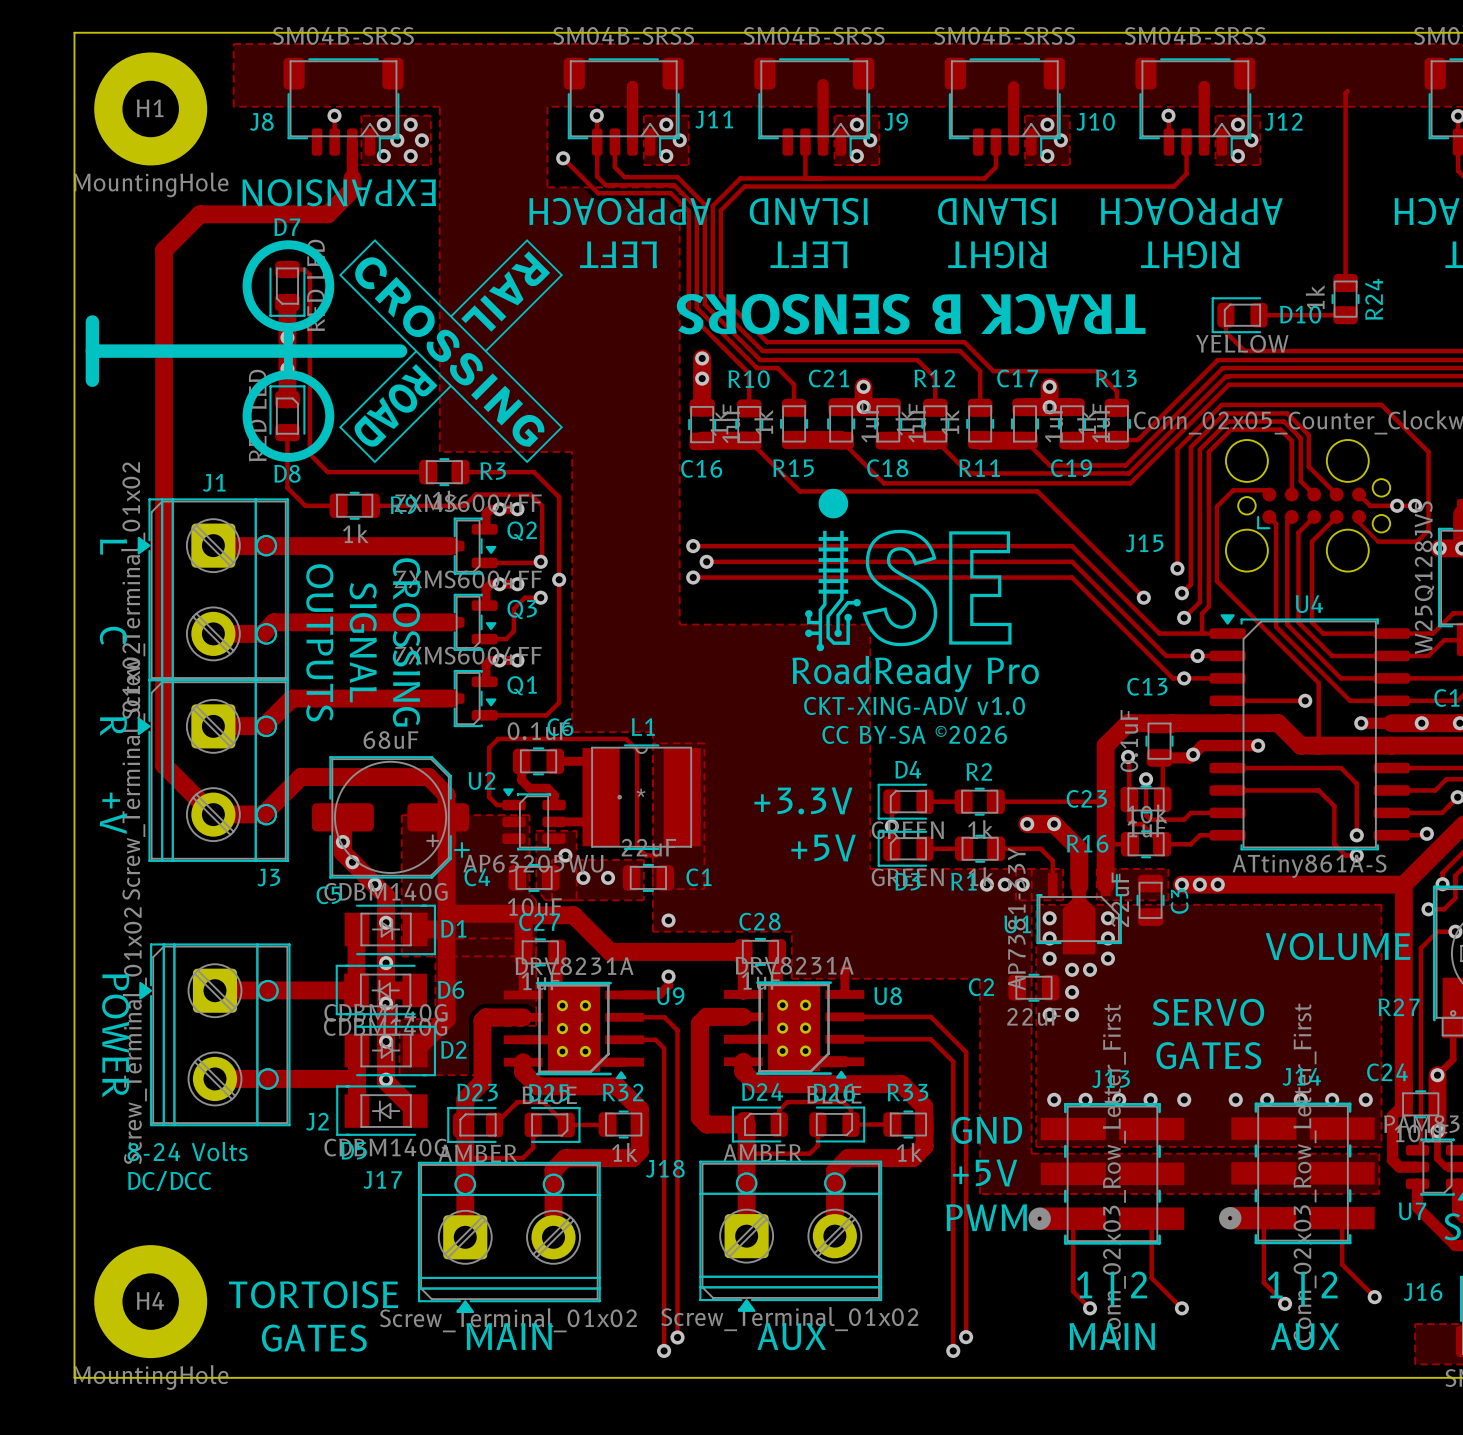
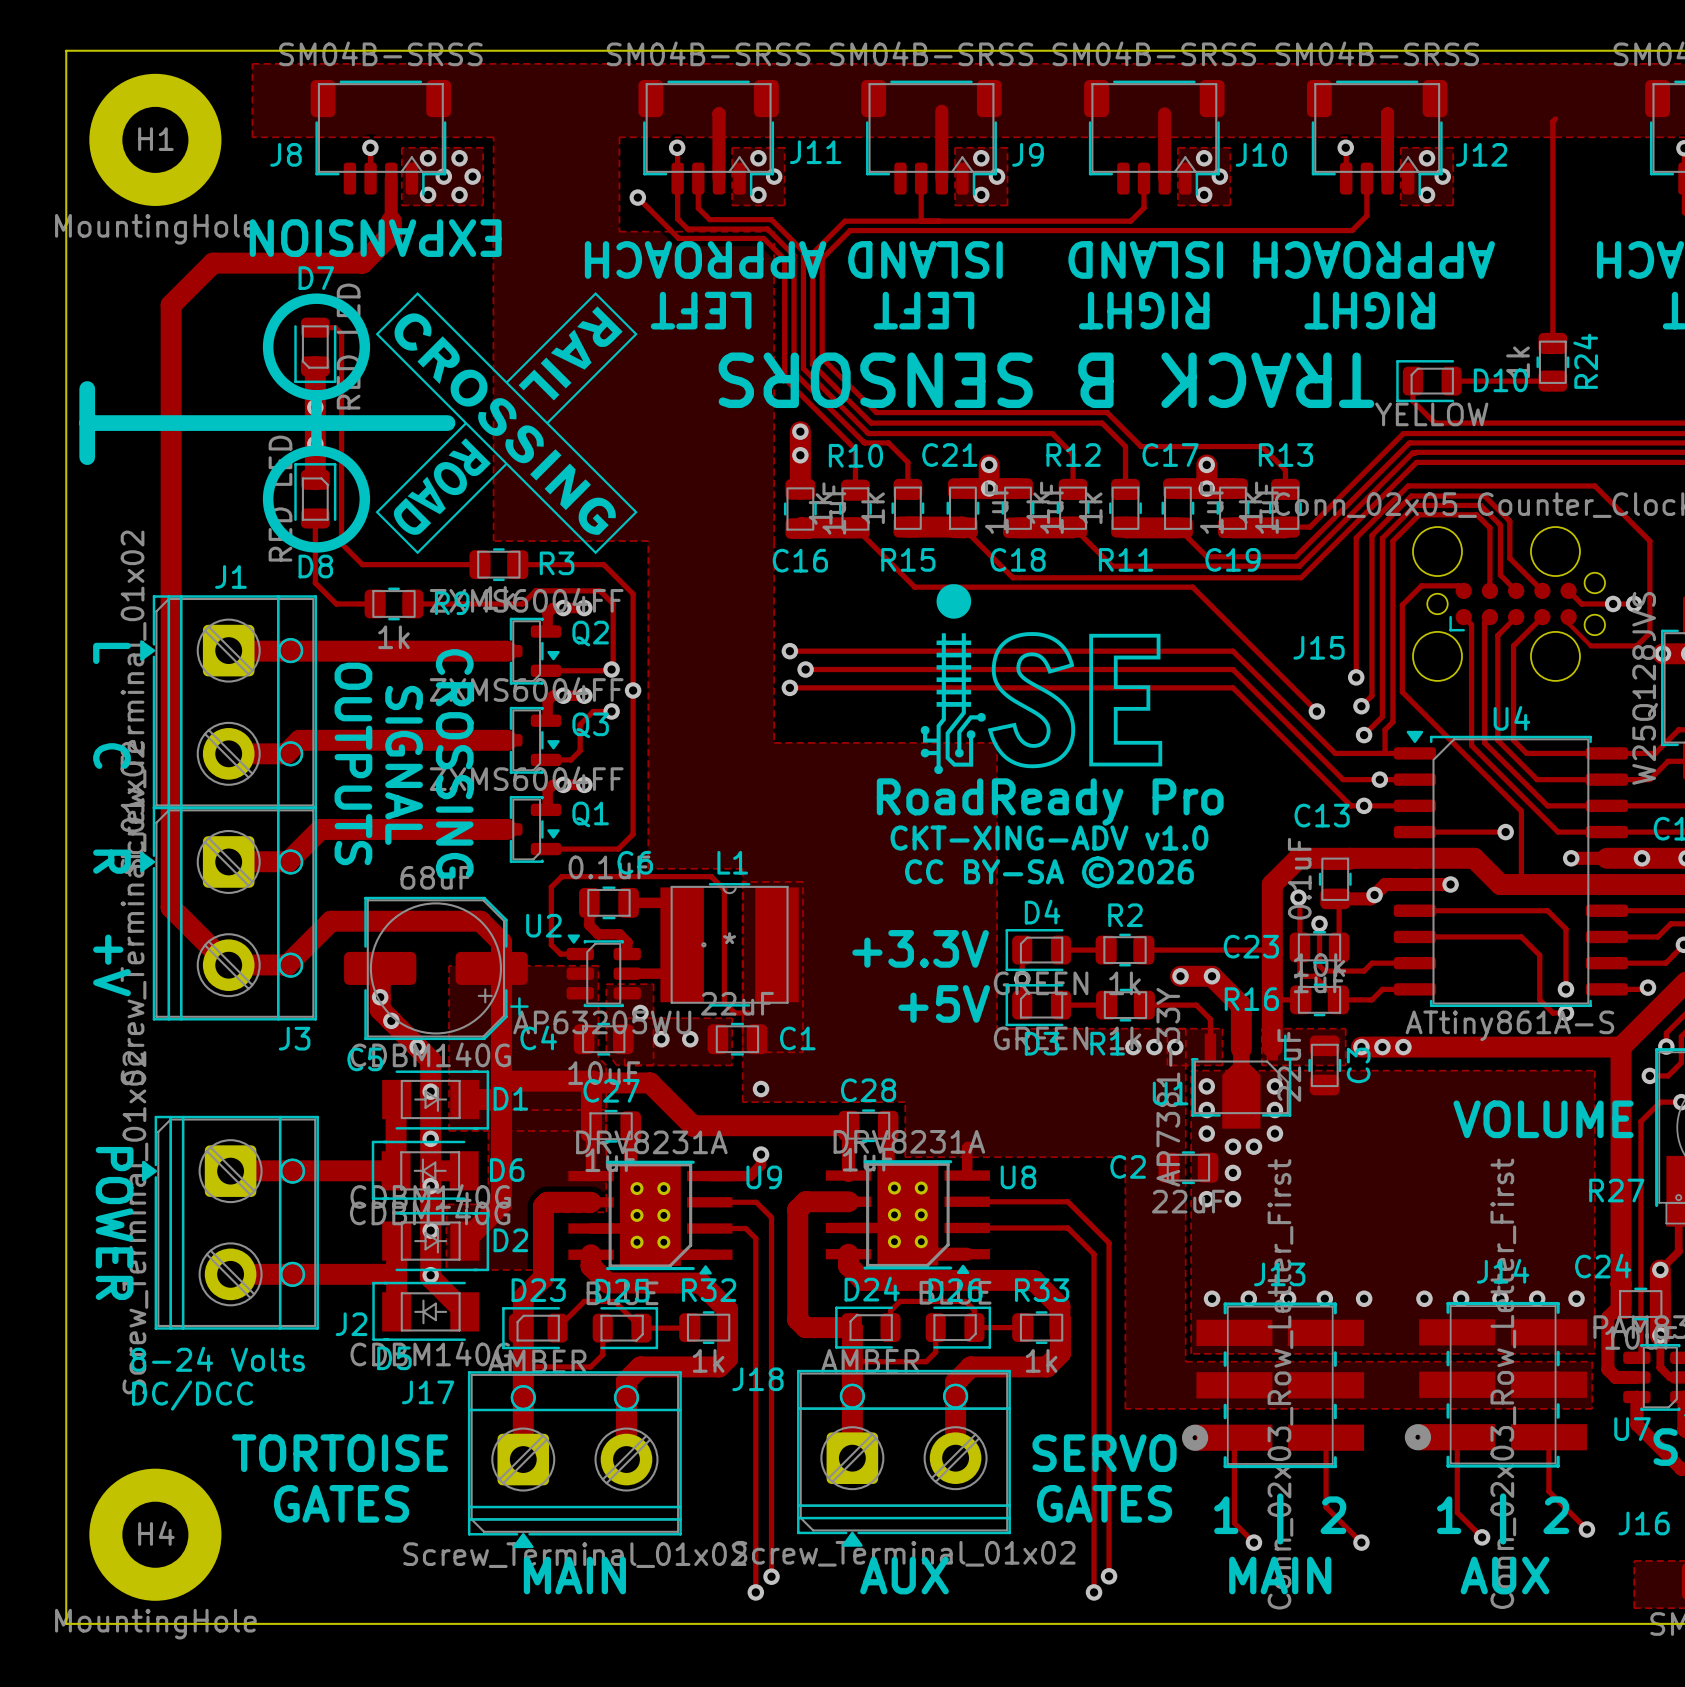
text position: SERVO (1208, 1012) -> SERVO (1104, 1453)
text: GATES (1208, 1055) -> none
text: GND (987, 1130) -> none
text: +5V (984, 1173) -> none
text: PWM (986, 1217) -> none
text: none -> GATES (1104, 1503)
text position: TORTOISE (313, 1294) -> TORTOISE (340, 1453)
text position: GATES (314, 1338) -> GATES (341, 1503)

